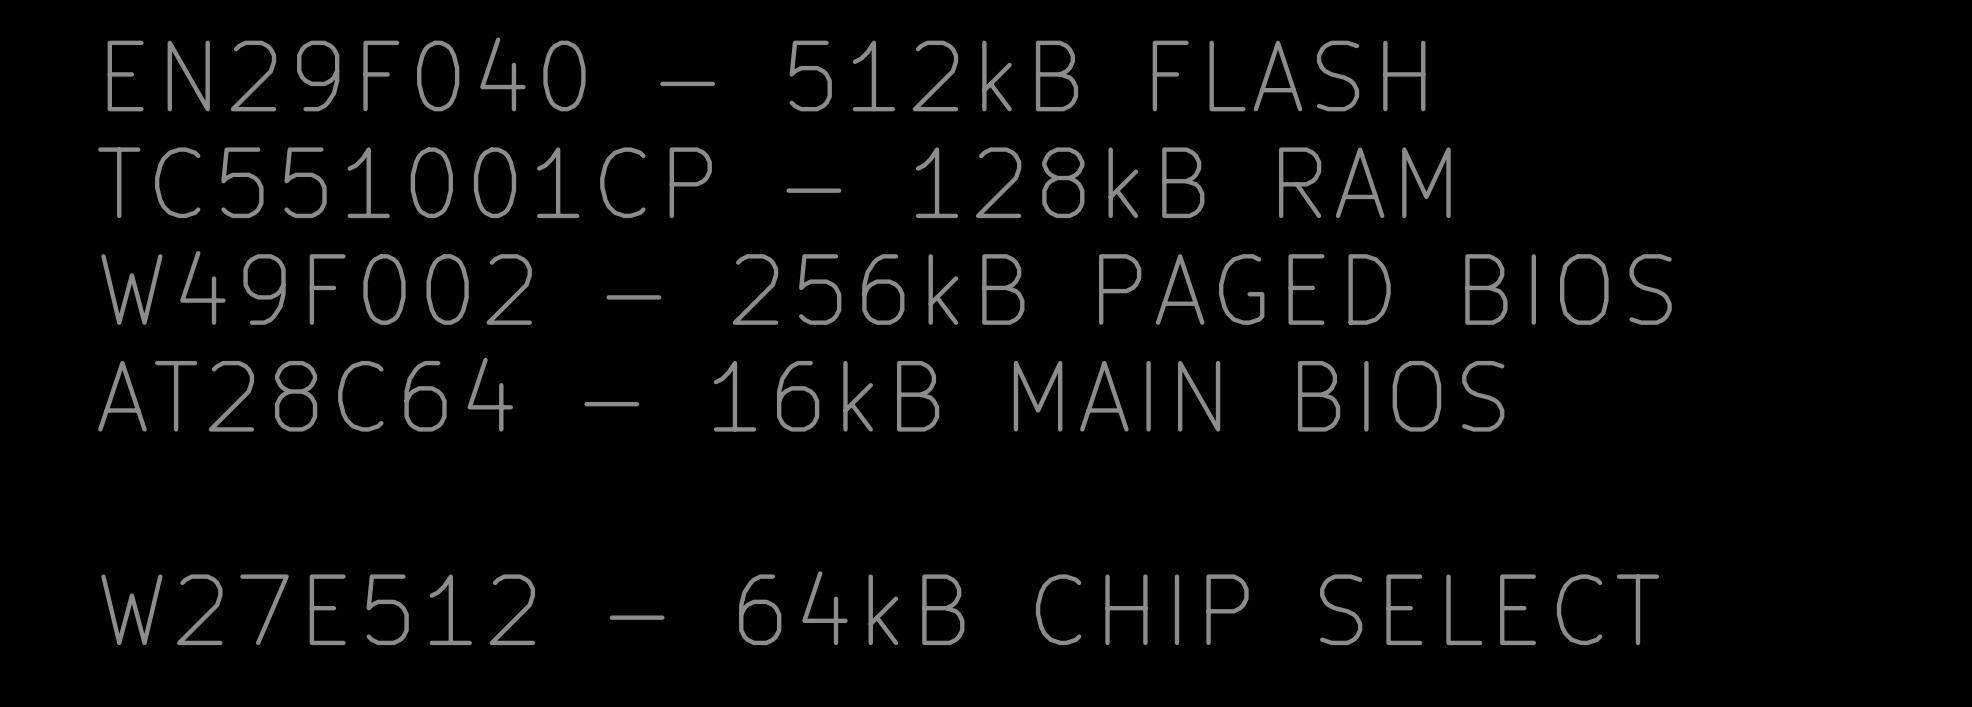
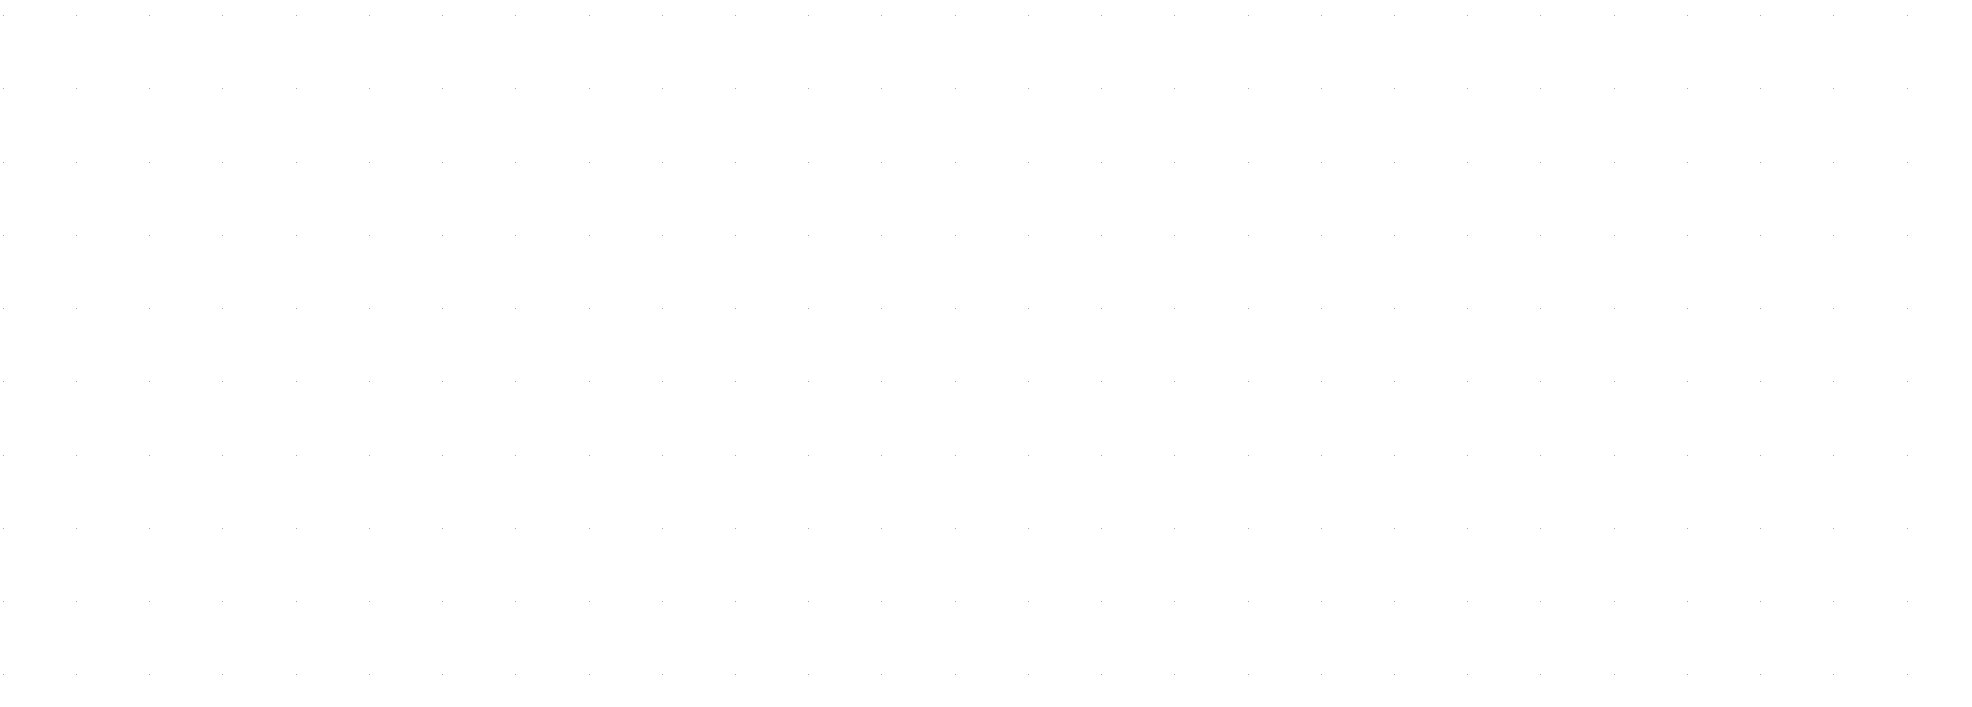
text: EN29F040 - 512kB FLASH (766, 74) -> none
text: TC551001CP - 128kB RAM (774, 182) -> none
text: W49F002 - 256kB PAGED BIOS (886, 287) -> none
text: AT28C64 - 16kB MAIN BIOS (801, 394) -> none
text: W27E512 - 64kB CHIP SELECT (880, 608) -> none

